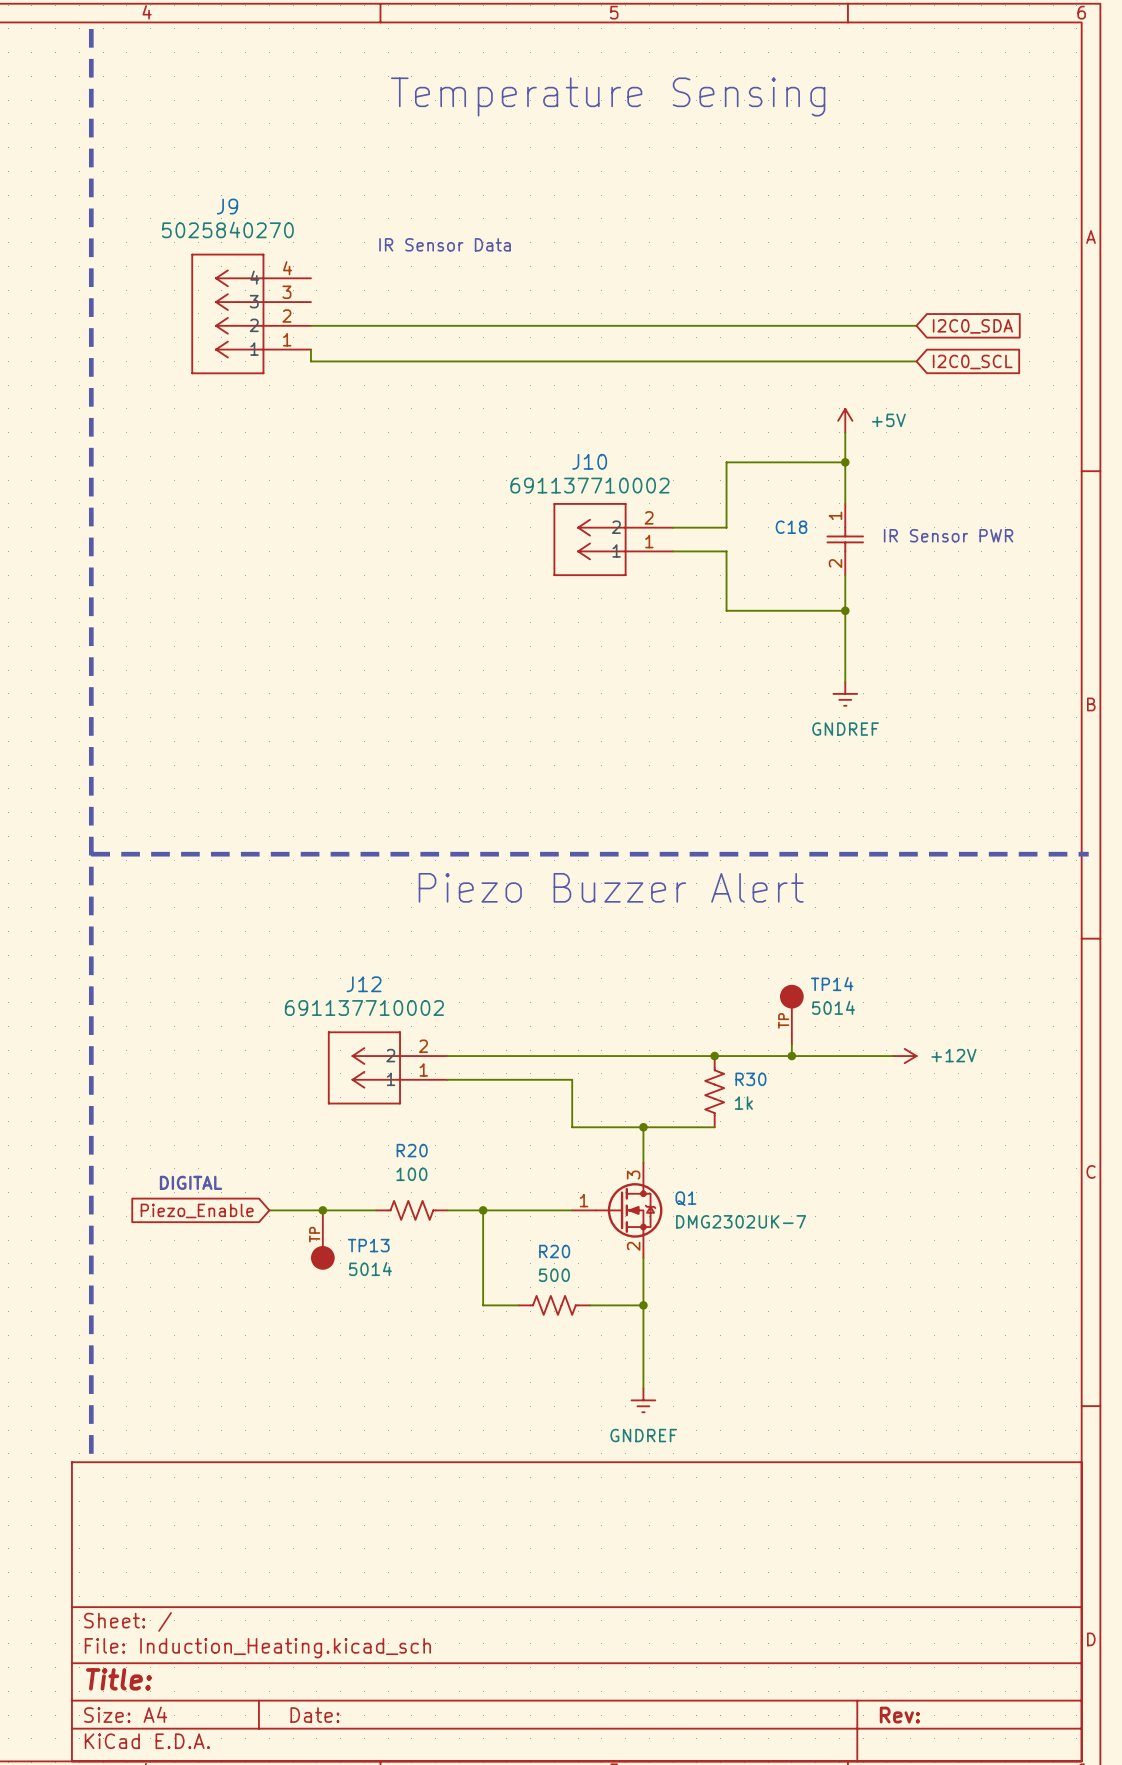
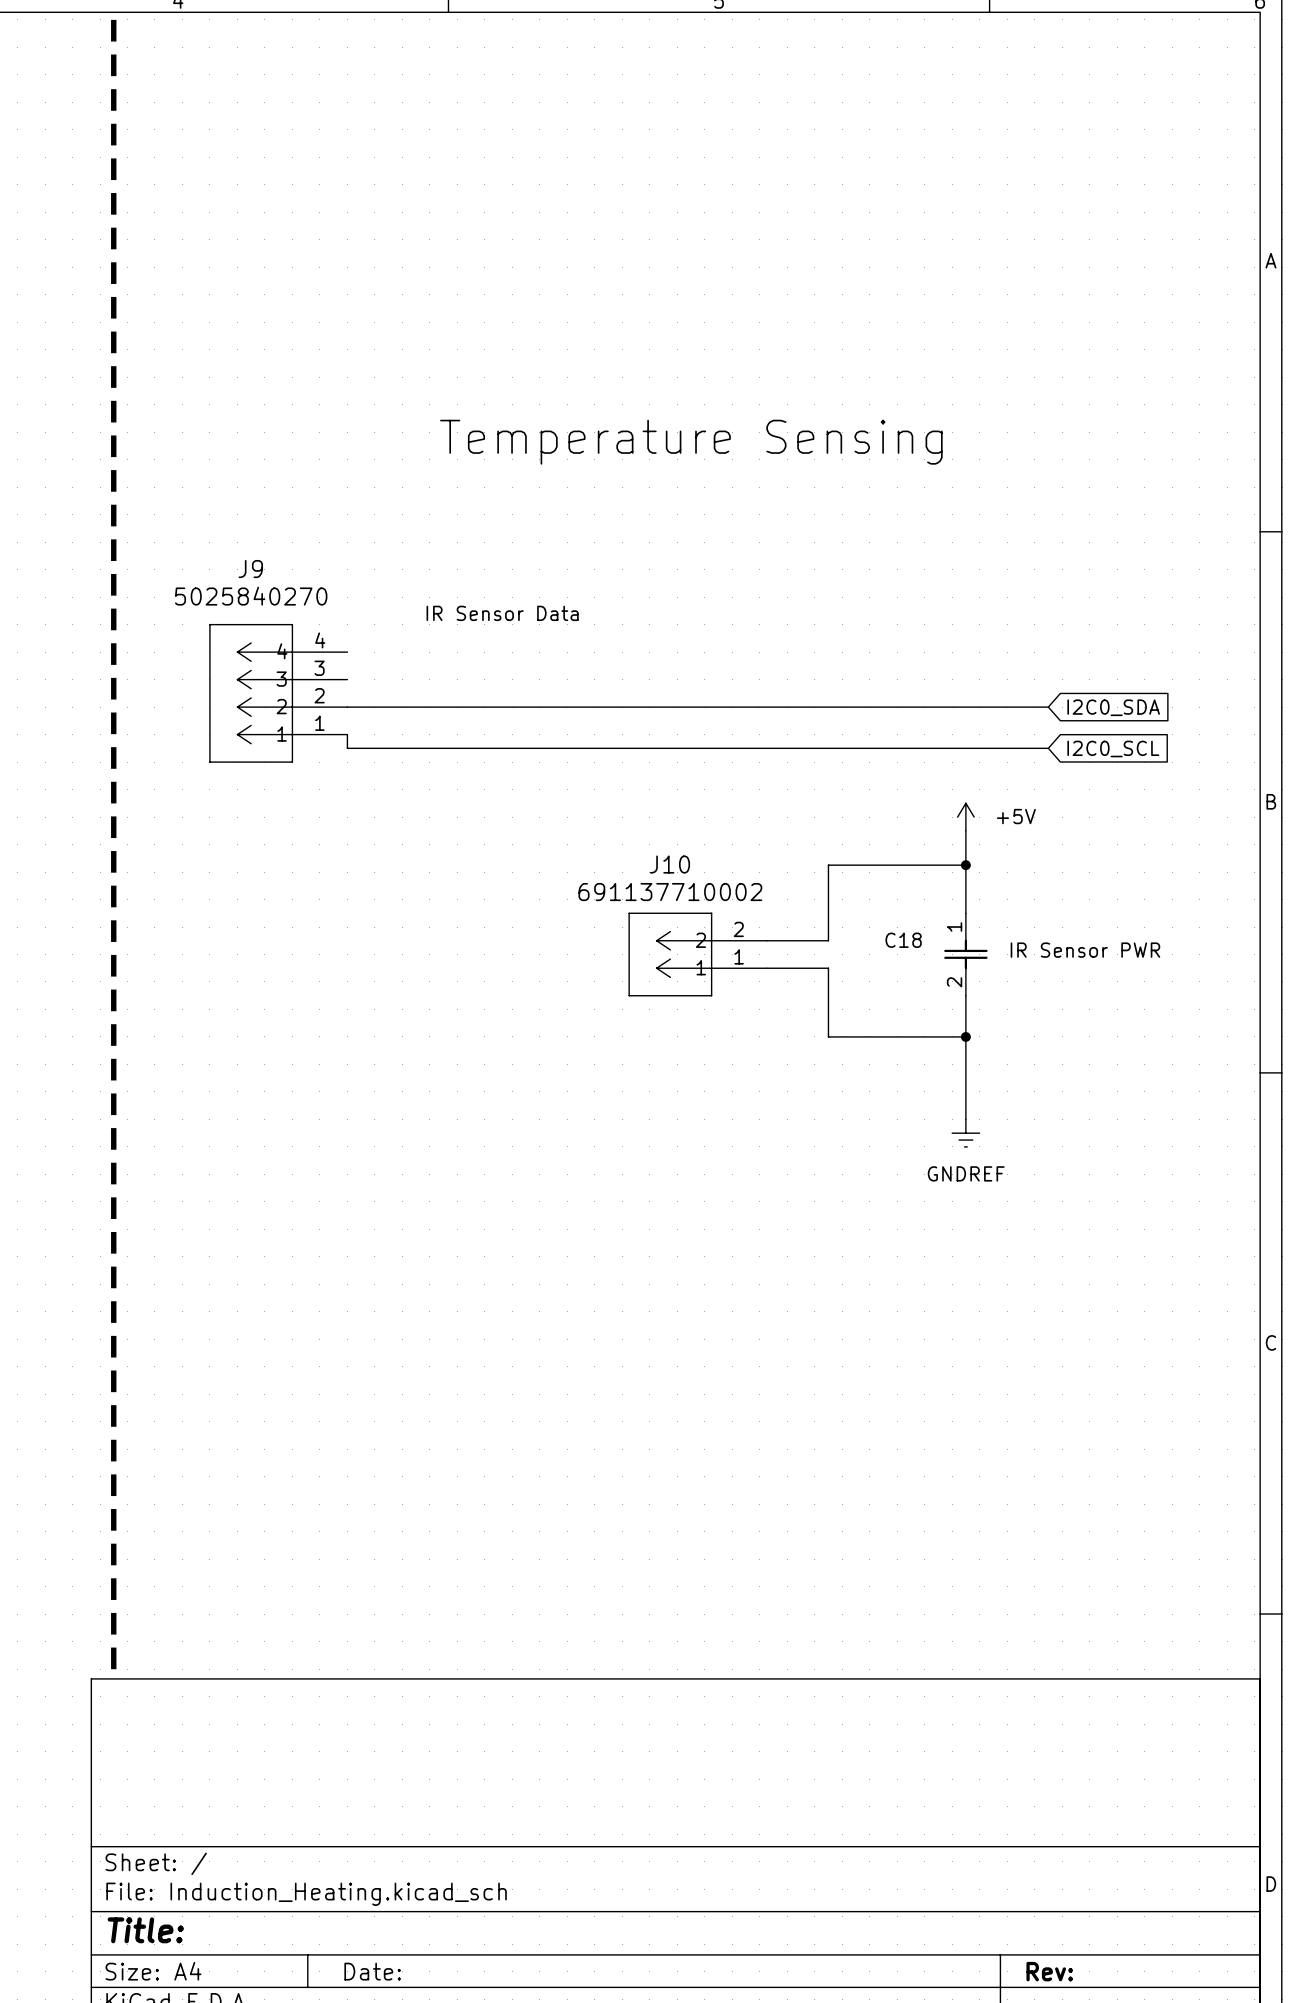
text: Temperature Sensing (608, 96) -> none
text: IR Sensor Data (445, 244) -> none
J9 position: (251, 313) -> (278, 693)
wire: (310, 325) (916, 325) -> none
global label: I2C0_SDA (972, 326) -> none
wire: (310, 349) (310, 361) (916, 361) -> none
global label: I2C0_SCL (972, 362) -> none
text: none -> Temperature Sensing (691, 442)
power symbol: +5V (845, 420) -> none
wire: (845, 432) (845, 503) -> none
wire: (845, 462) (726, 462) (726, 527) (673, 527) -> none
junction: (845, 462) -> none
text: IR Sensor PWR (948, 535) -> none
J10 position: (613, 539) -> (697, 954)
C18 position: (845, 539) -> (965, 954)
text: none -> IR Sensor Data (502, 613)
wire: (673, 551) (726, 551) (726, 610) (845, 610) -> none
wire: (845, 575) (845, 682) -> none
junction: (845, 610) -> none
wire: none -> (347, 707) (1048, 707)
global label: none -> I2C0_SDA (1113, 707)
wire: none -> (347, 734) (347, 748) (1048, 748)
global label: none -> I2C0_SCL (1113, 748)
power symbol: GNDREF (845, 693) -> none
power symbol: none -> +5V (965, 817)
wire: none -> (965, 830) (965, 913)
wire: none -> (965, 865) (828, 865) (828, 940) (766, 940)
junction: none -> (965, 865)
text: none -> IR Sensor PWR (1085, 950)
wire: none -> (766, 968) (828, 968) (828, 1036) (965, 1036)
line: (91, 854) (1088, 854) -> none
wire: none -> (965, 995) (965, 1119)
text: Piezo Buzzer Alert (611, 887) -> none
junction: none -> (965, 1036)
power symbol: none -> GNDREF (965, 1133)
TP14: 5014 (791, 1014) -> none
wire: (791, 1044) (791, 1056) -> none
wire: (447, 1056) (892, 1056) -> none
junction: (714, 1056) -> none
junction: (791, 1056) -> none
power symbol: +12V (904, 1056) -> none
J12: 691137710002 (387, 1067) -> none
wire: (447, 1079) (572, 1079) (572, 1127) (714, 1127) -> none
R30: 1k (714, 1091) -> none
wire: (643, 1127) (643, 1162) -> none
junction: (643, 1127) -> none
text: DIGITAL (190, 1182) -> none
global label: Piezo_Enable (197, 1210) -> none
wire: (269, 1210) (376, 1210) -> none
junction: (322, 1210) -> none
R20: 100 (411, 1210) -> none
wire: (447, 1210) (572, 1210) -> none
wire: (483, 1210) (483, 1305) (518, 1305) -> none
junction: (483, 1210) -> none
Q1: DMG2302UK-7 (617, 1210) -> none
TP13: 5014 (322, 1240) -> none
wire: (643, 1257) (643, 1388) -> none
R20: 500 (554, 1305) -> none
wire: (590, 1305) (643, 1305) -> none
junction: (643, 1305) -> none
power symbol: GNDREF (643, 1400) -> none

